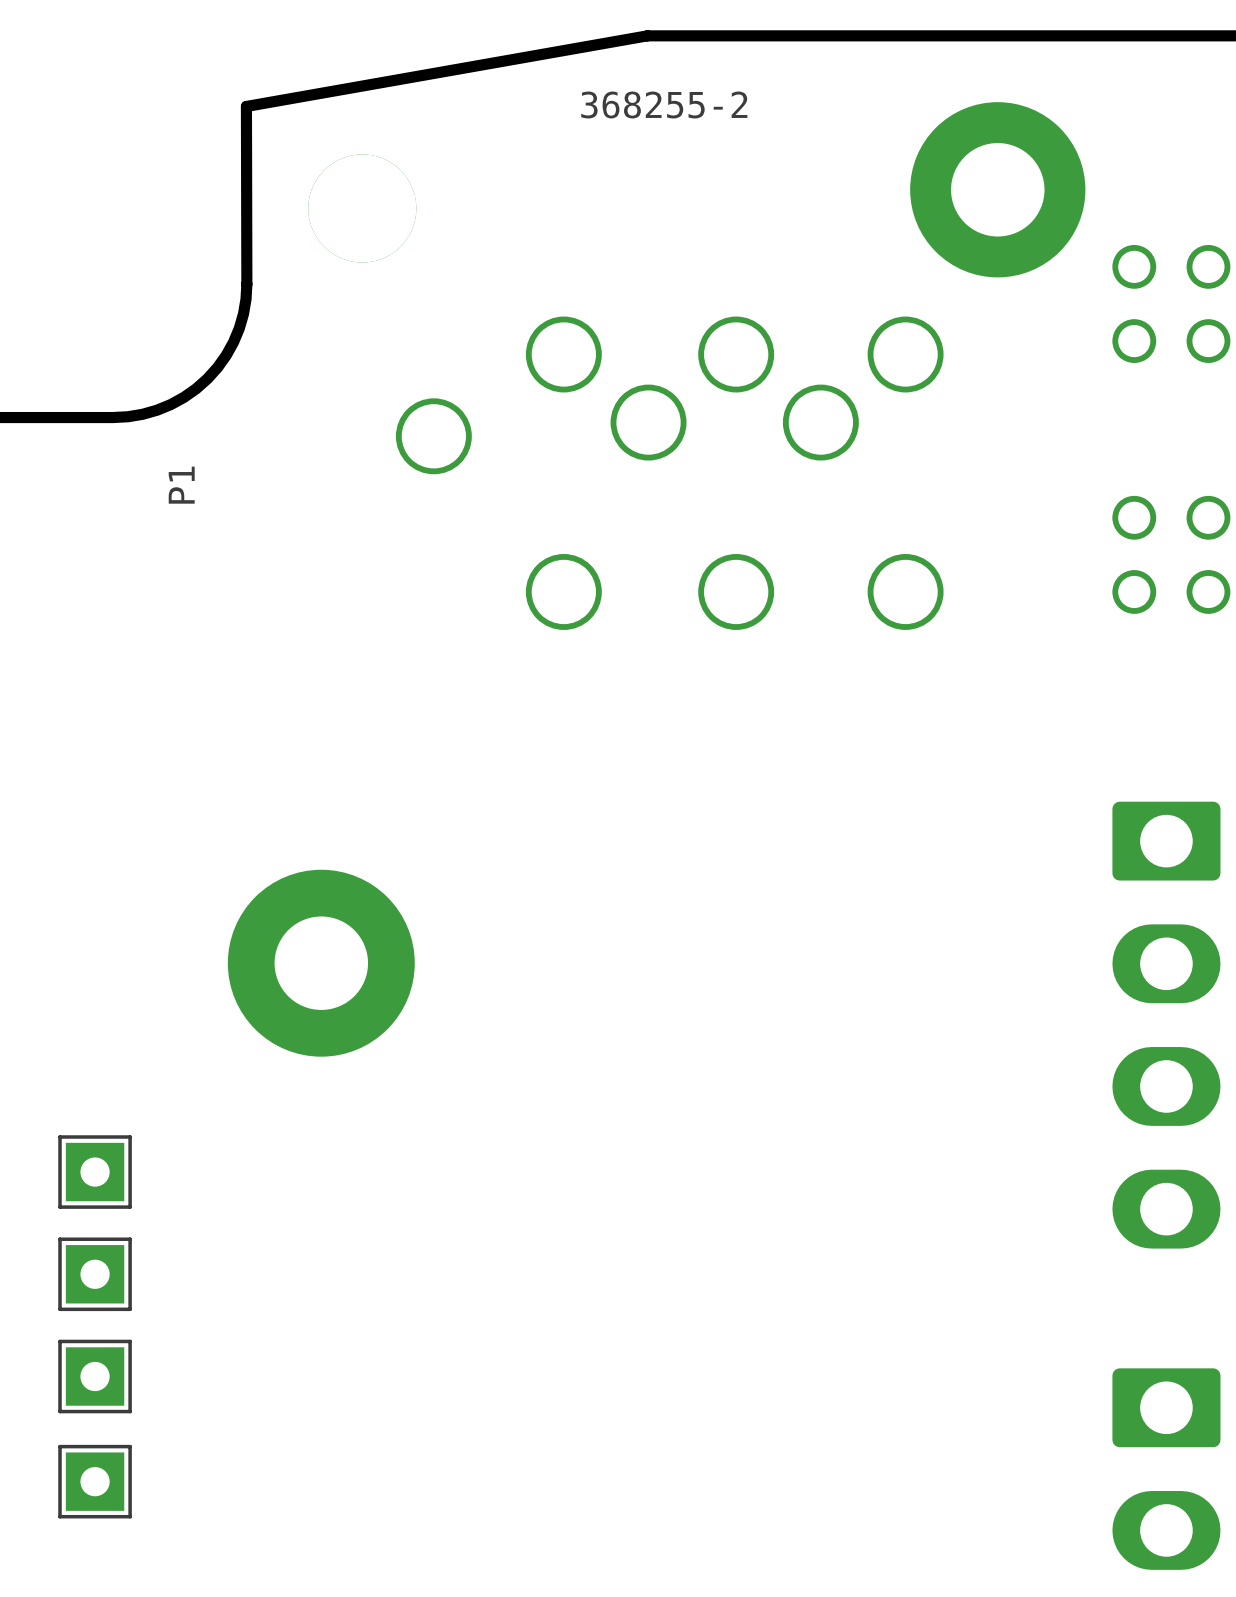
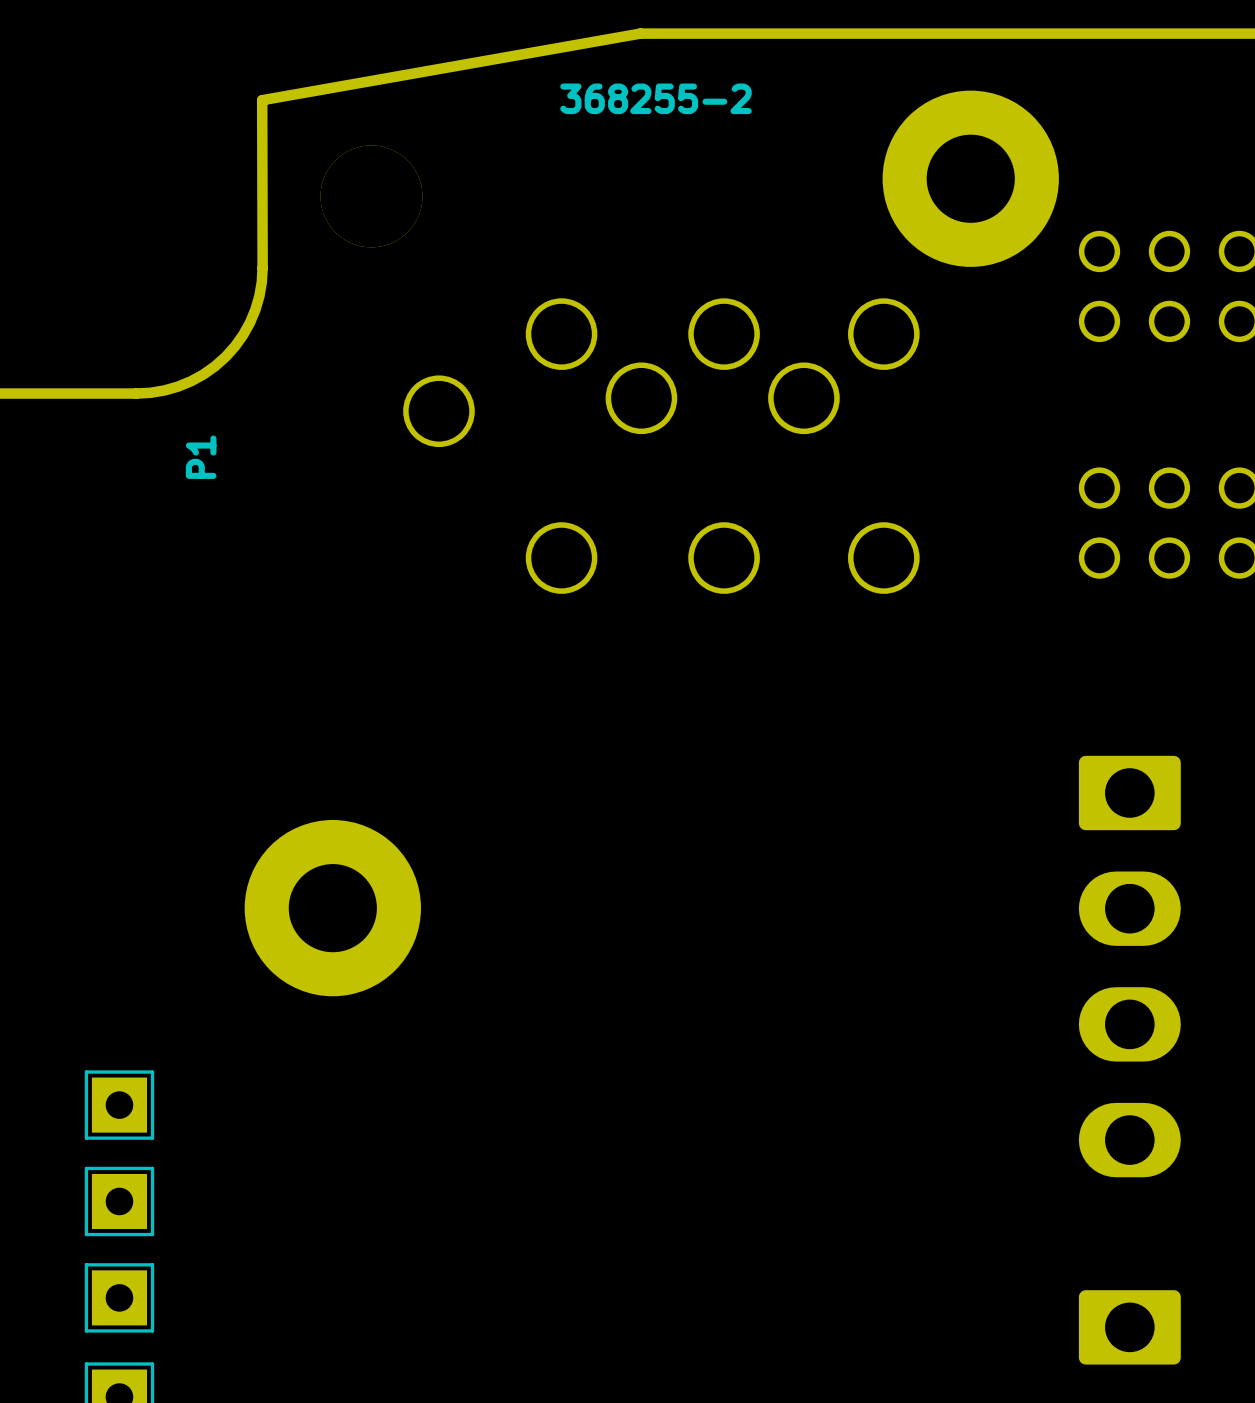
part footprint: [910, 102, 1086, 278] -> [882, 90, 1059, 267]

